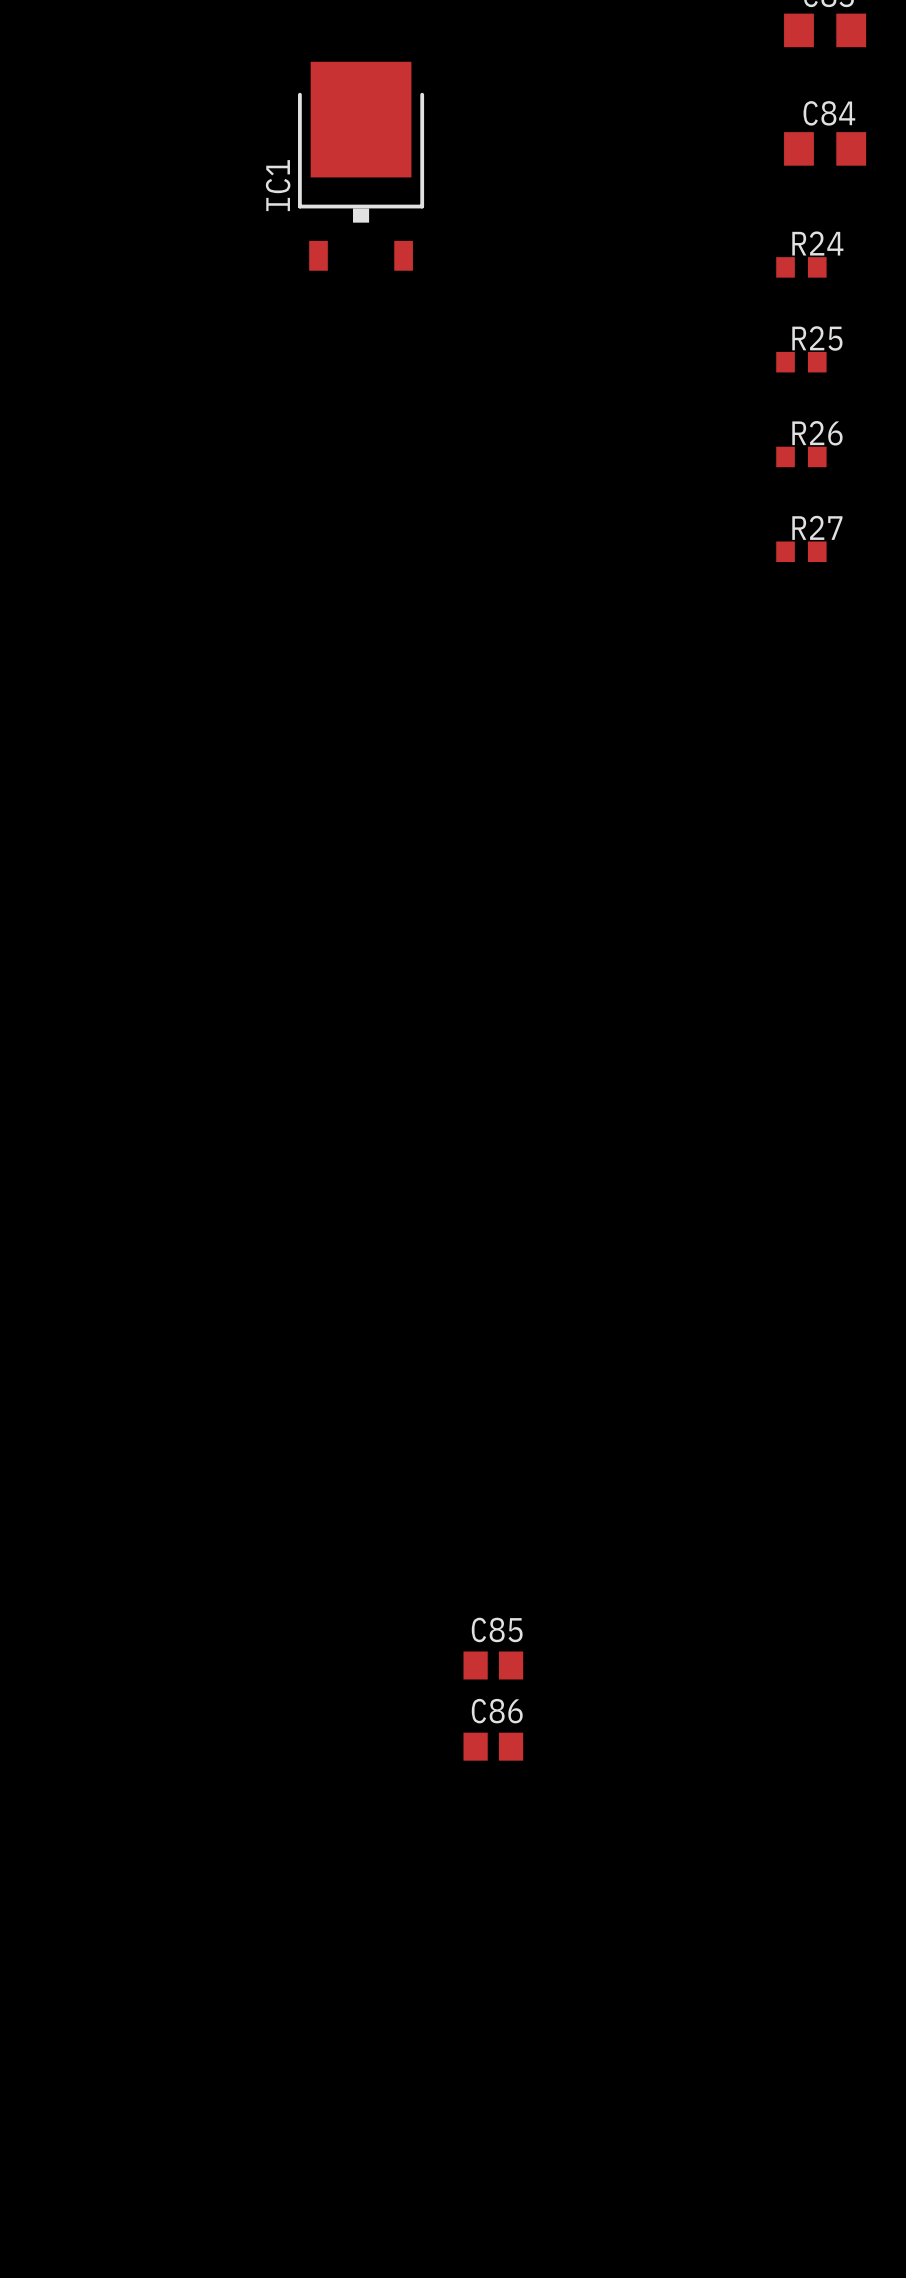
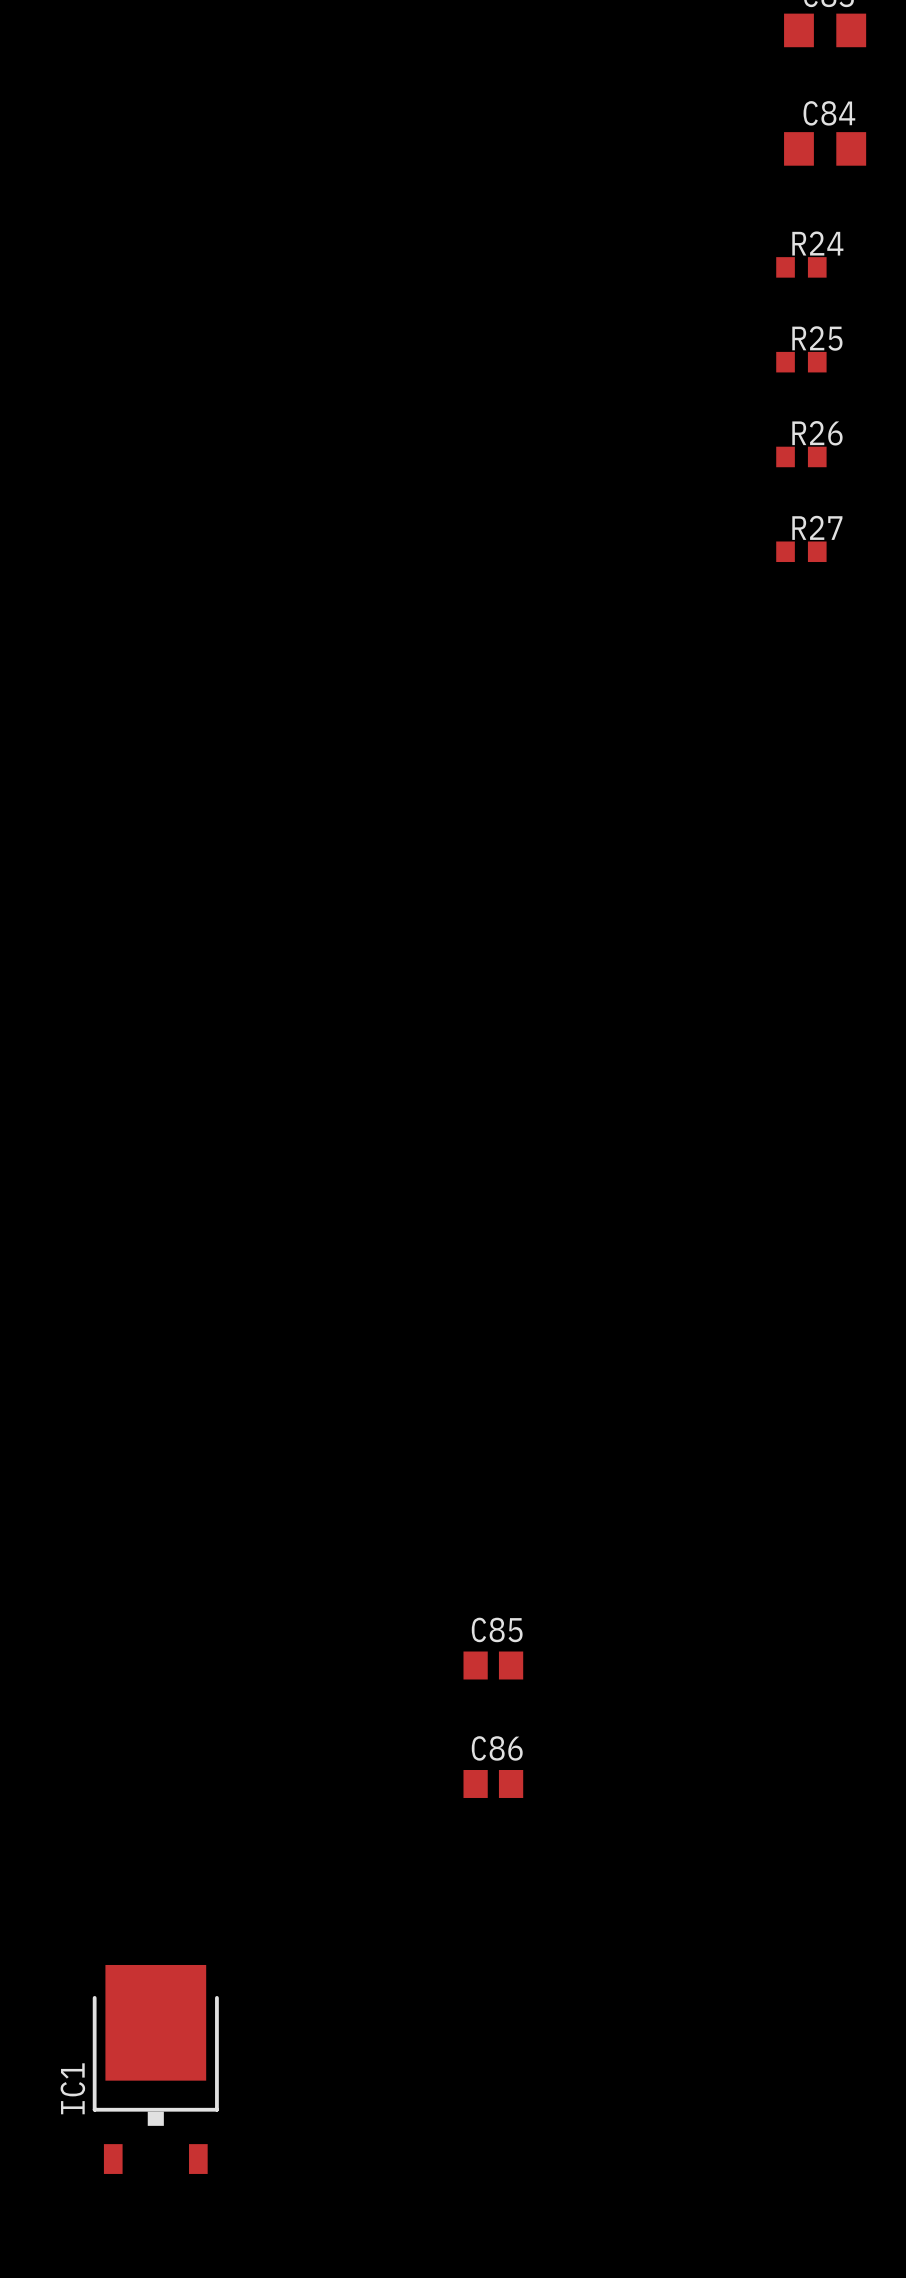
IC1 position: (361, 166) -> (155, 2069)
C86 position: (493, 1746) -> (493, 1783)

